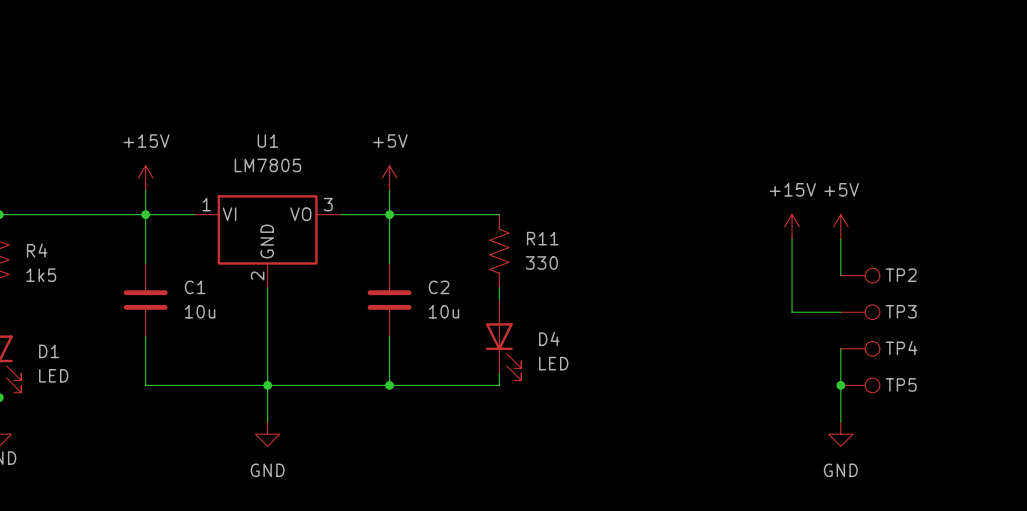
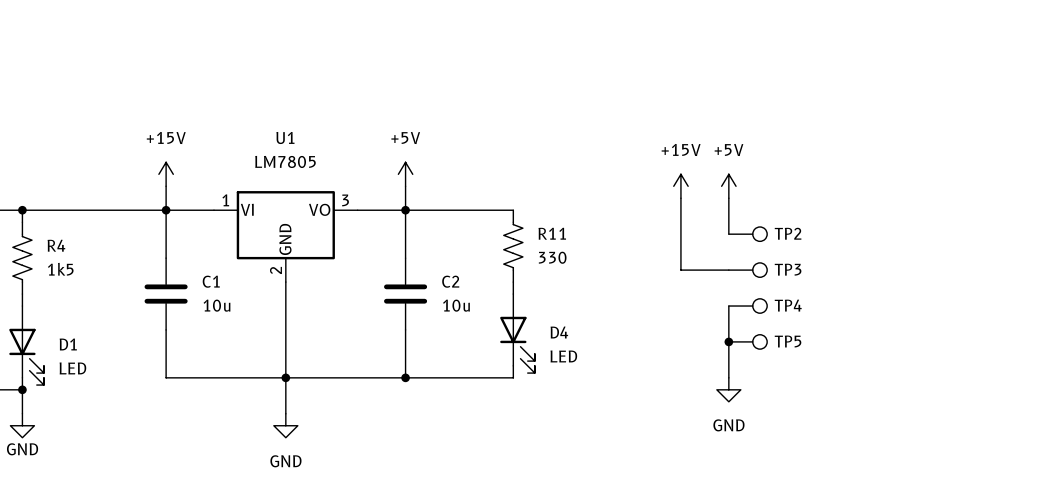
power symbol position: +15V (792, 226) -> +15V (680, 186)
power symbol position: +5V (840, 226) -> +5V (728, 186)
wire: (792, 239) (792, 312) (840, 312) -> (680, 198) (680, 270) (728, 270)
wire: (840, 239) (840, 275) -> (728, 198) (728, 234)
TP2 position: (860, 275) -> (748, 234)
TP3 position: (860, 312) -> (748, 270)
junction: none -> (728, 341)
wire: (840, 348) (840, 421) -> (728, 306) (728, 377)
TP4 position: (860, 348) -> (748, 306)
junction: (840, 385) -> none
TP5 position: (860, 385) -> (748, 341)
power symbol position: GND (840, 434) -> GND (728, 389)

